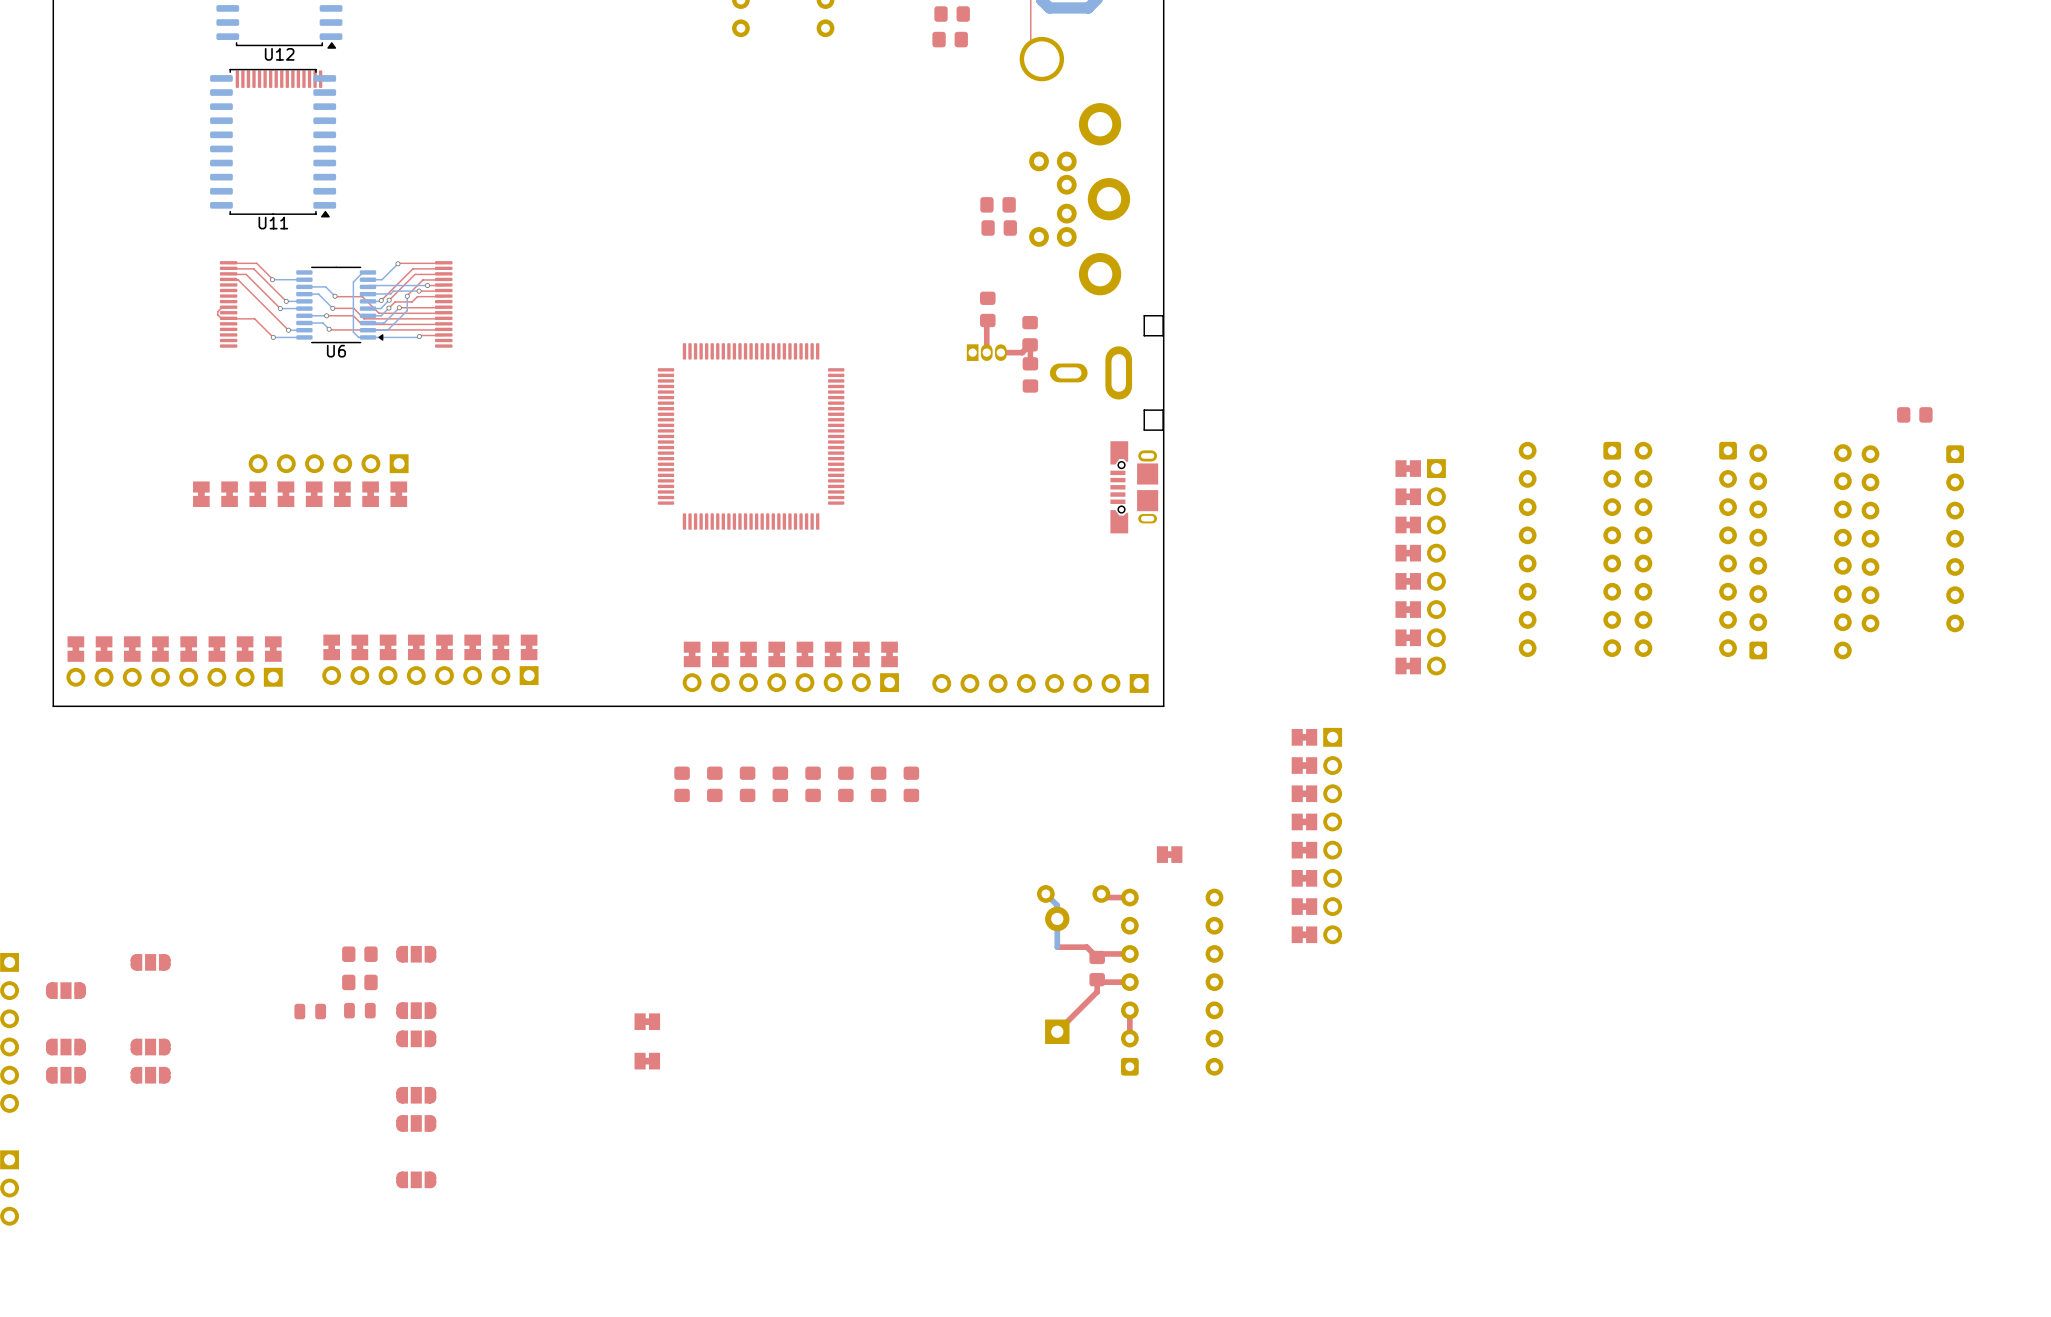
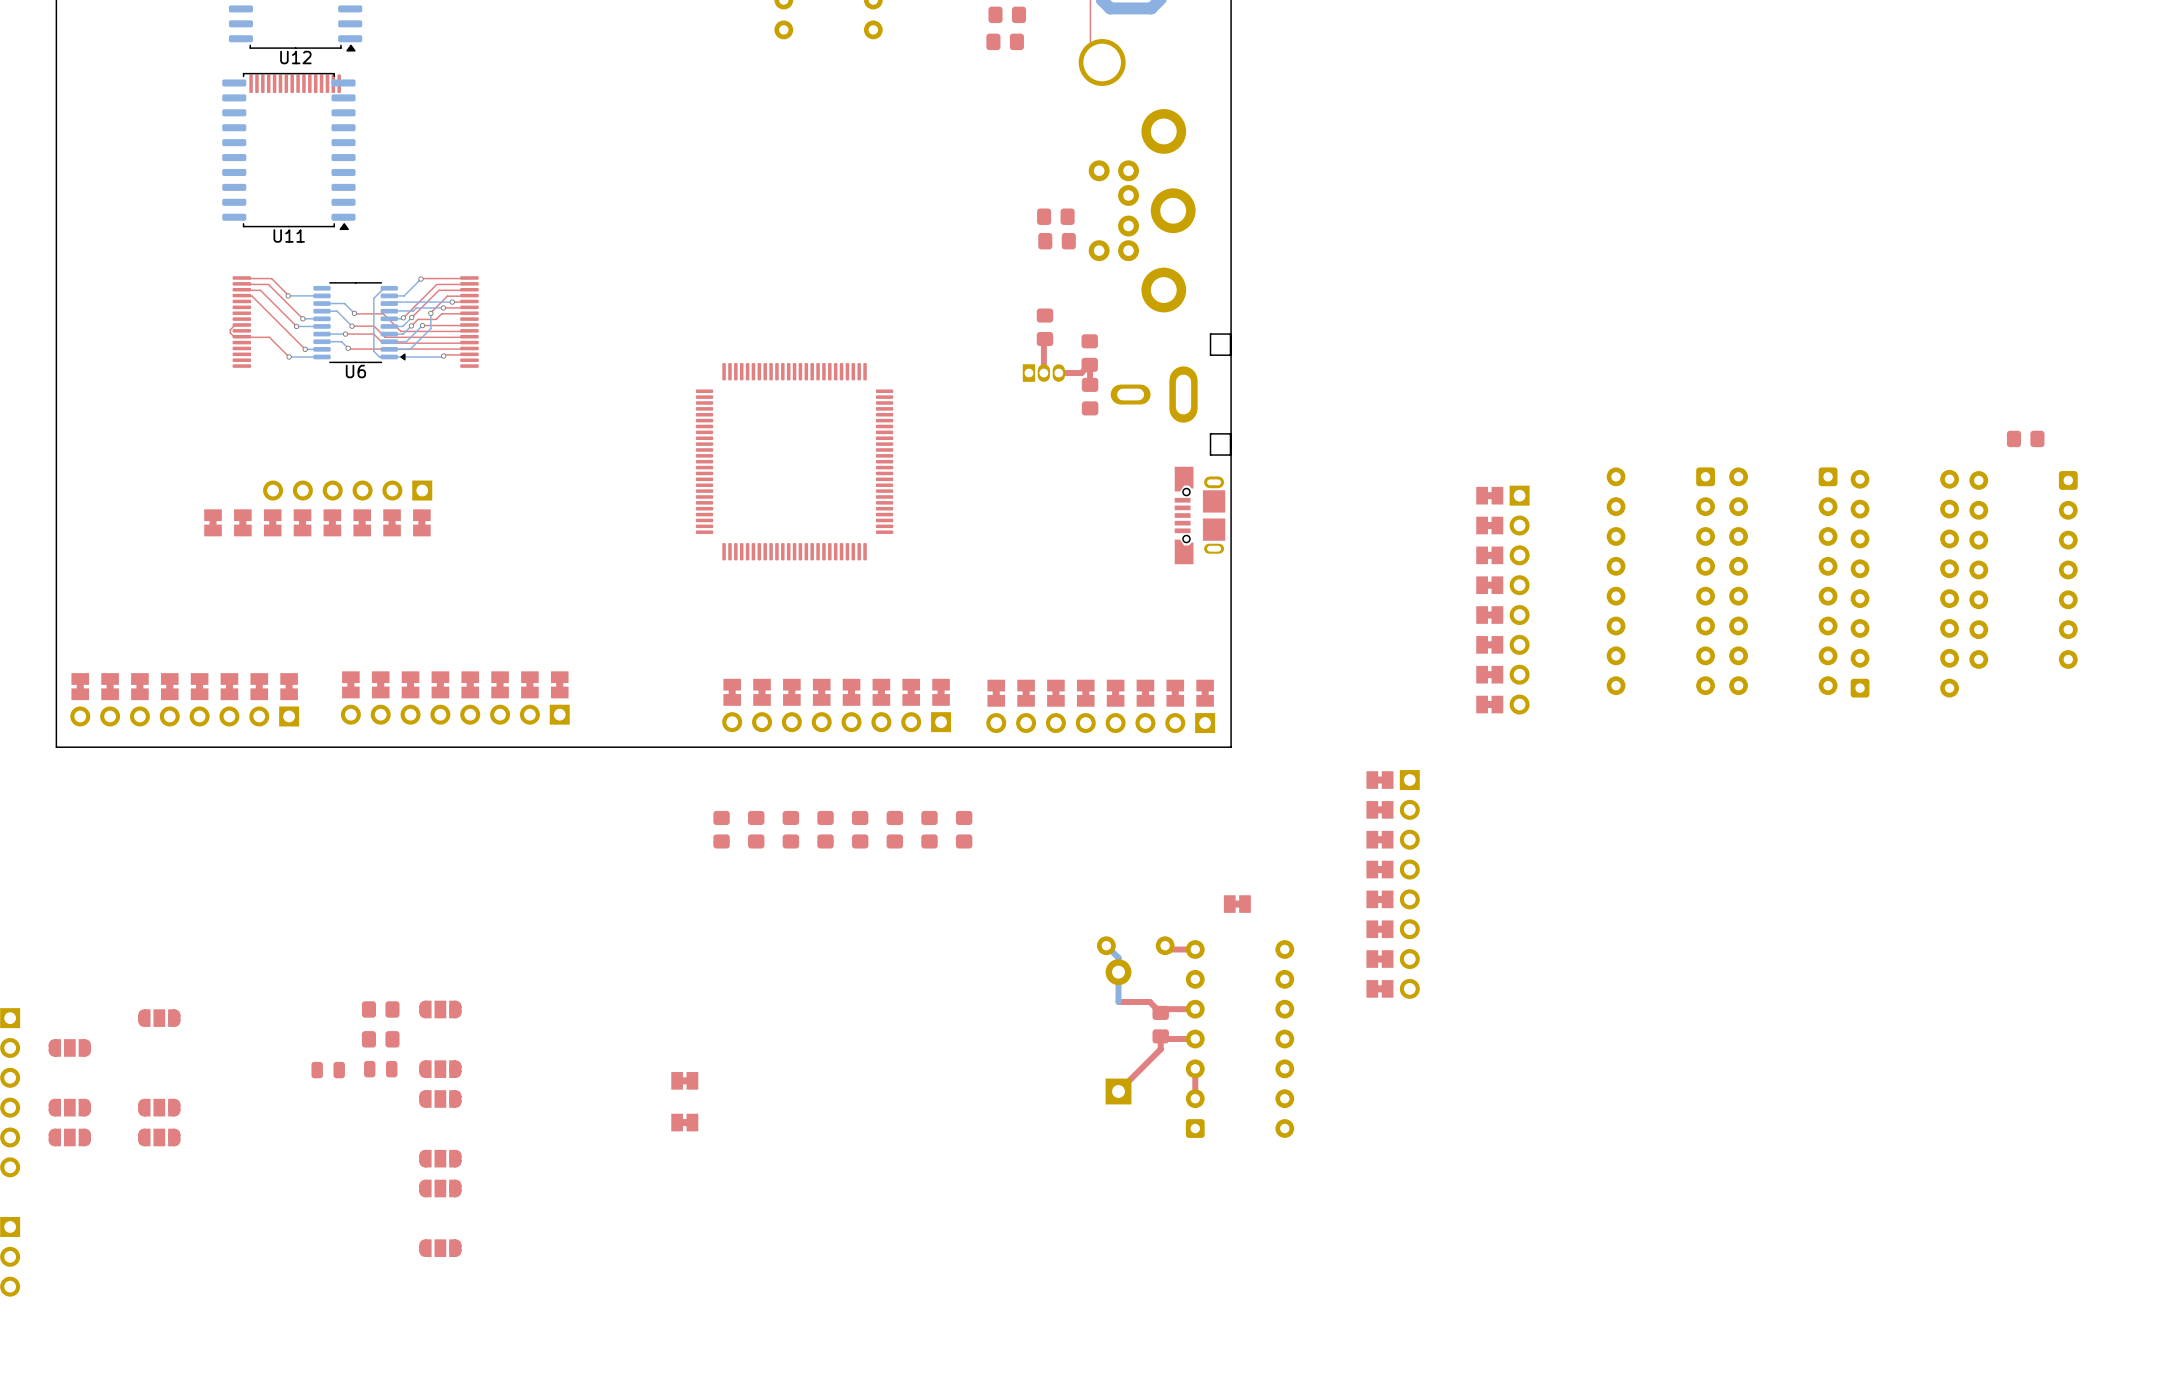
part: none -> (996, 693)
part: none -> (1026, 693)
part: none -> (1055, 693)
part: none -> (1085, 693)
part: none -> (1115, 693)
part: none -> (1145, 693)
part: none -> (1175, 693)
part: none -> (1205, 693)

